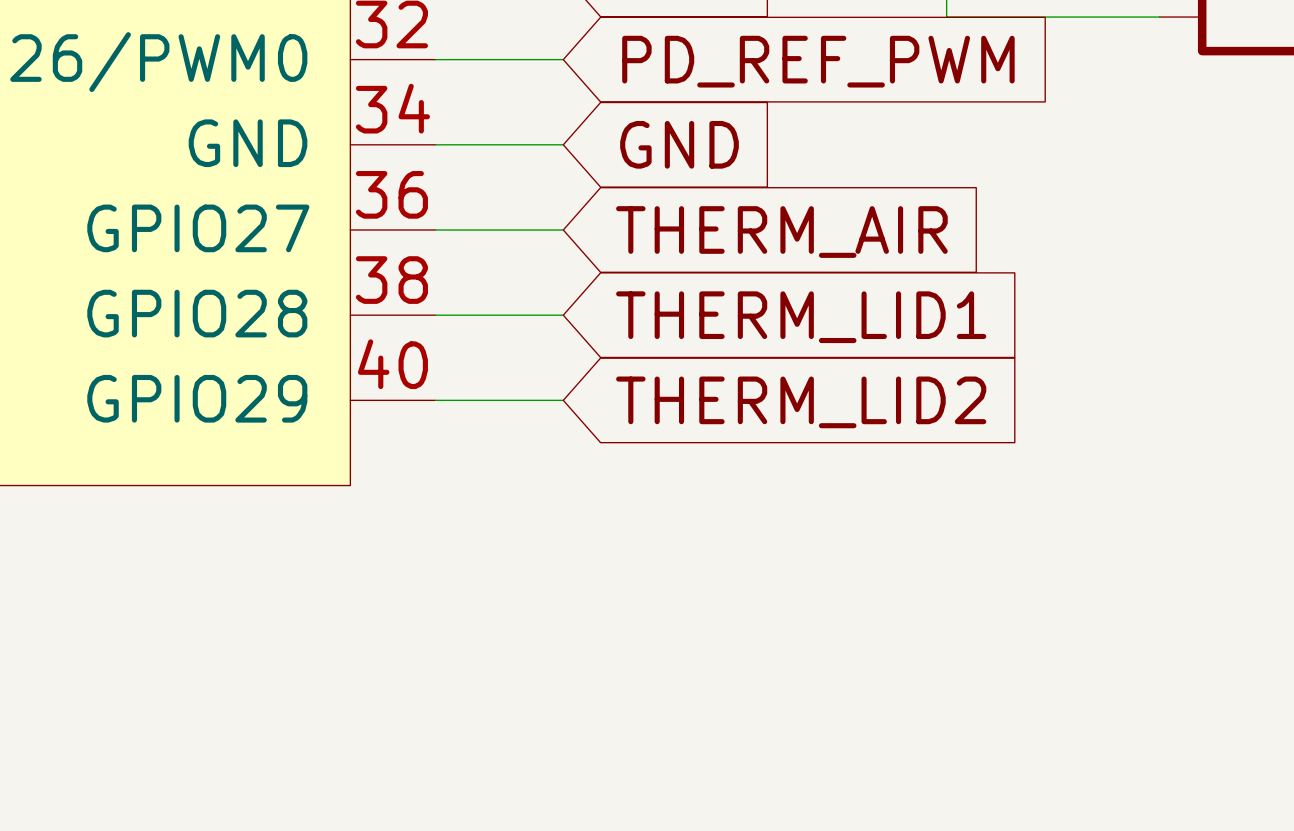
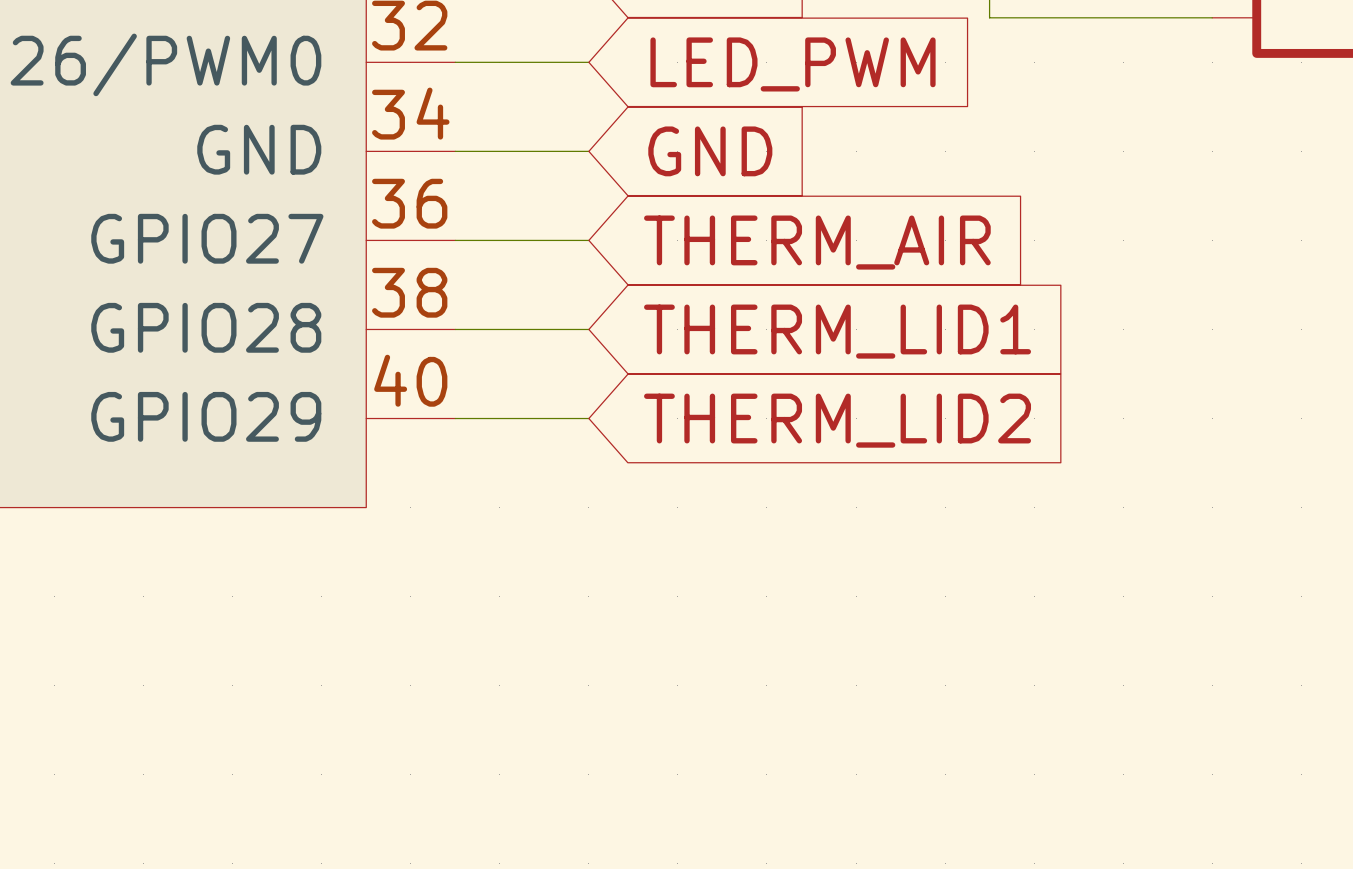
global label: PD_REF_PWM (818, 61) -> LED_PWM (793, 64)

